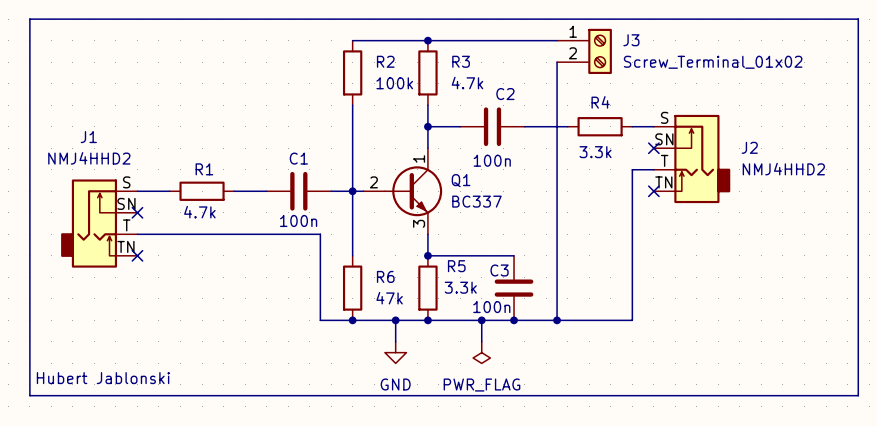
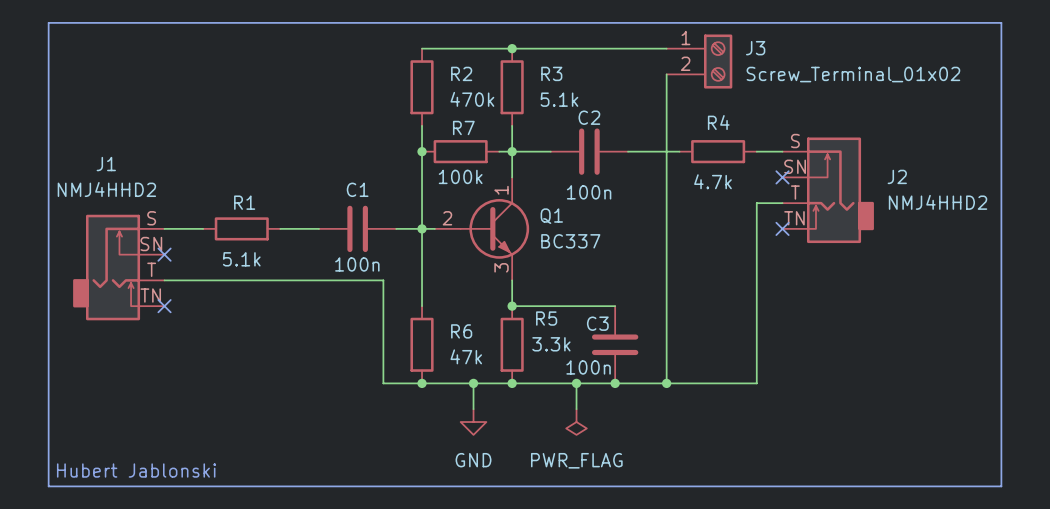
line: (40, 19) (29, 19) (29, 395) (858, 395) (858, 19) (836, 19) -> (48, 22) (48, 486) (1001, 486) (1001, 22)
R2 value: 100k (394, 83) -> 470k (472, 99)
R3 value: 4.7k (467, 83) -> 5.1k (559, 99)
C2 name position: C2 (505, 94) -> C2 (589, 117)
junction: none -> (422, 151)
R7: none -> 100k (460, 151)
wire: none -> (499, 151) (512, 151)
R4 value: 3.3k (595, 152) -> 4.7k (712, 181)
R1 value: 4.7k (199, 212) -> 5.1k (241, 259)
text position: Hubert Jablonski (103, 378) -> Hubert Jablonski (136, 470)

